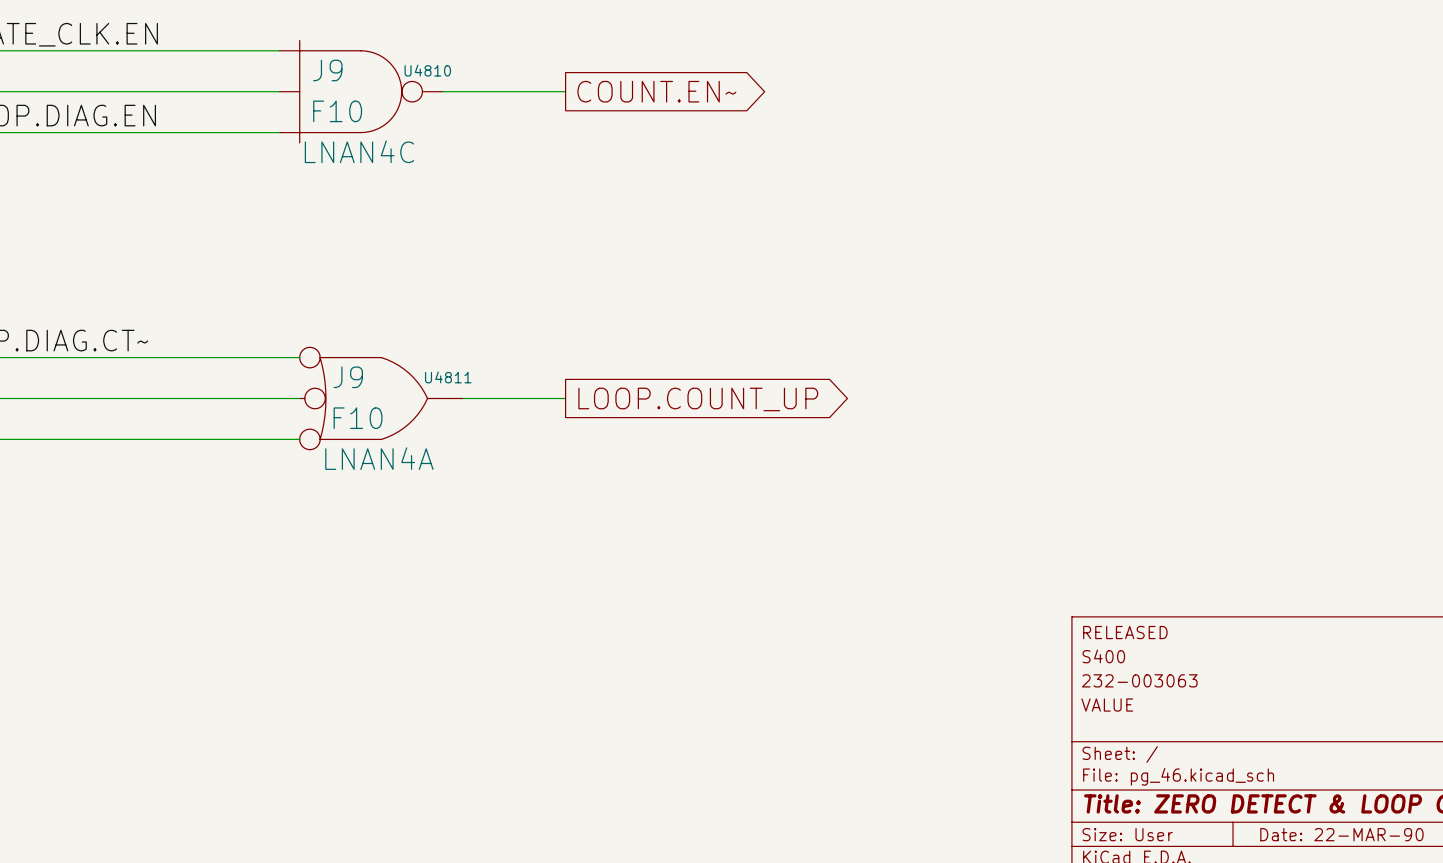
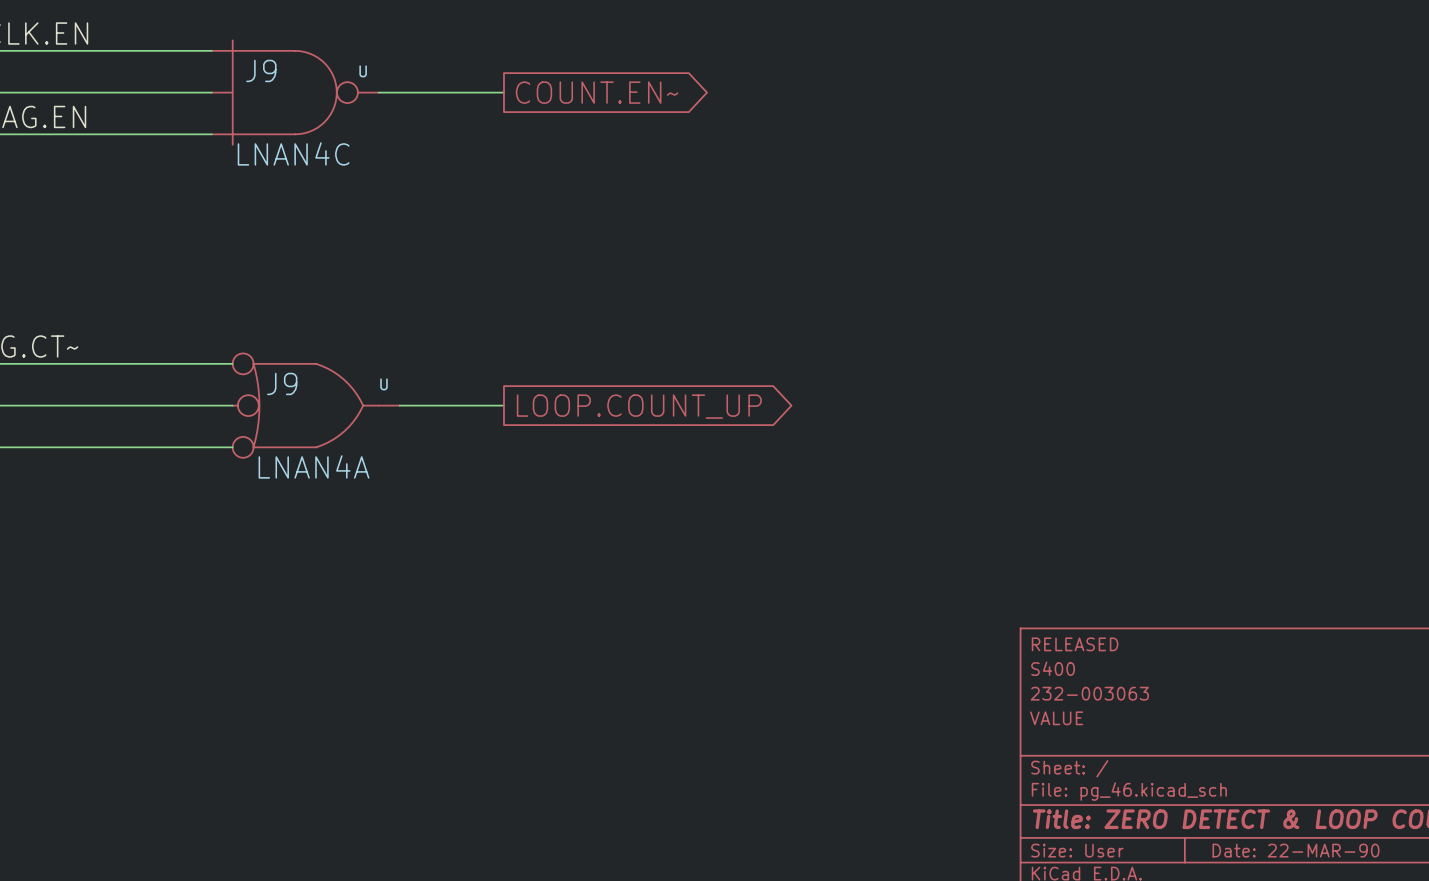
U4810 name: U4810 (427, 70) -> U (363, 71)
U4810 value: F10 (337, 111) -> none
U4811 name: U4811 (448, 377) -> U (383, 384)
U4811 value: F10 (358, 418) -> none

